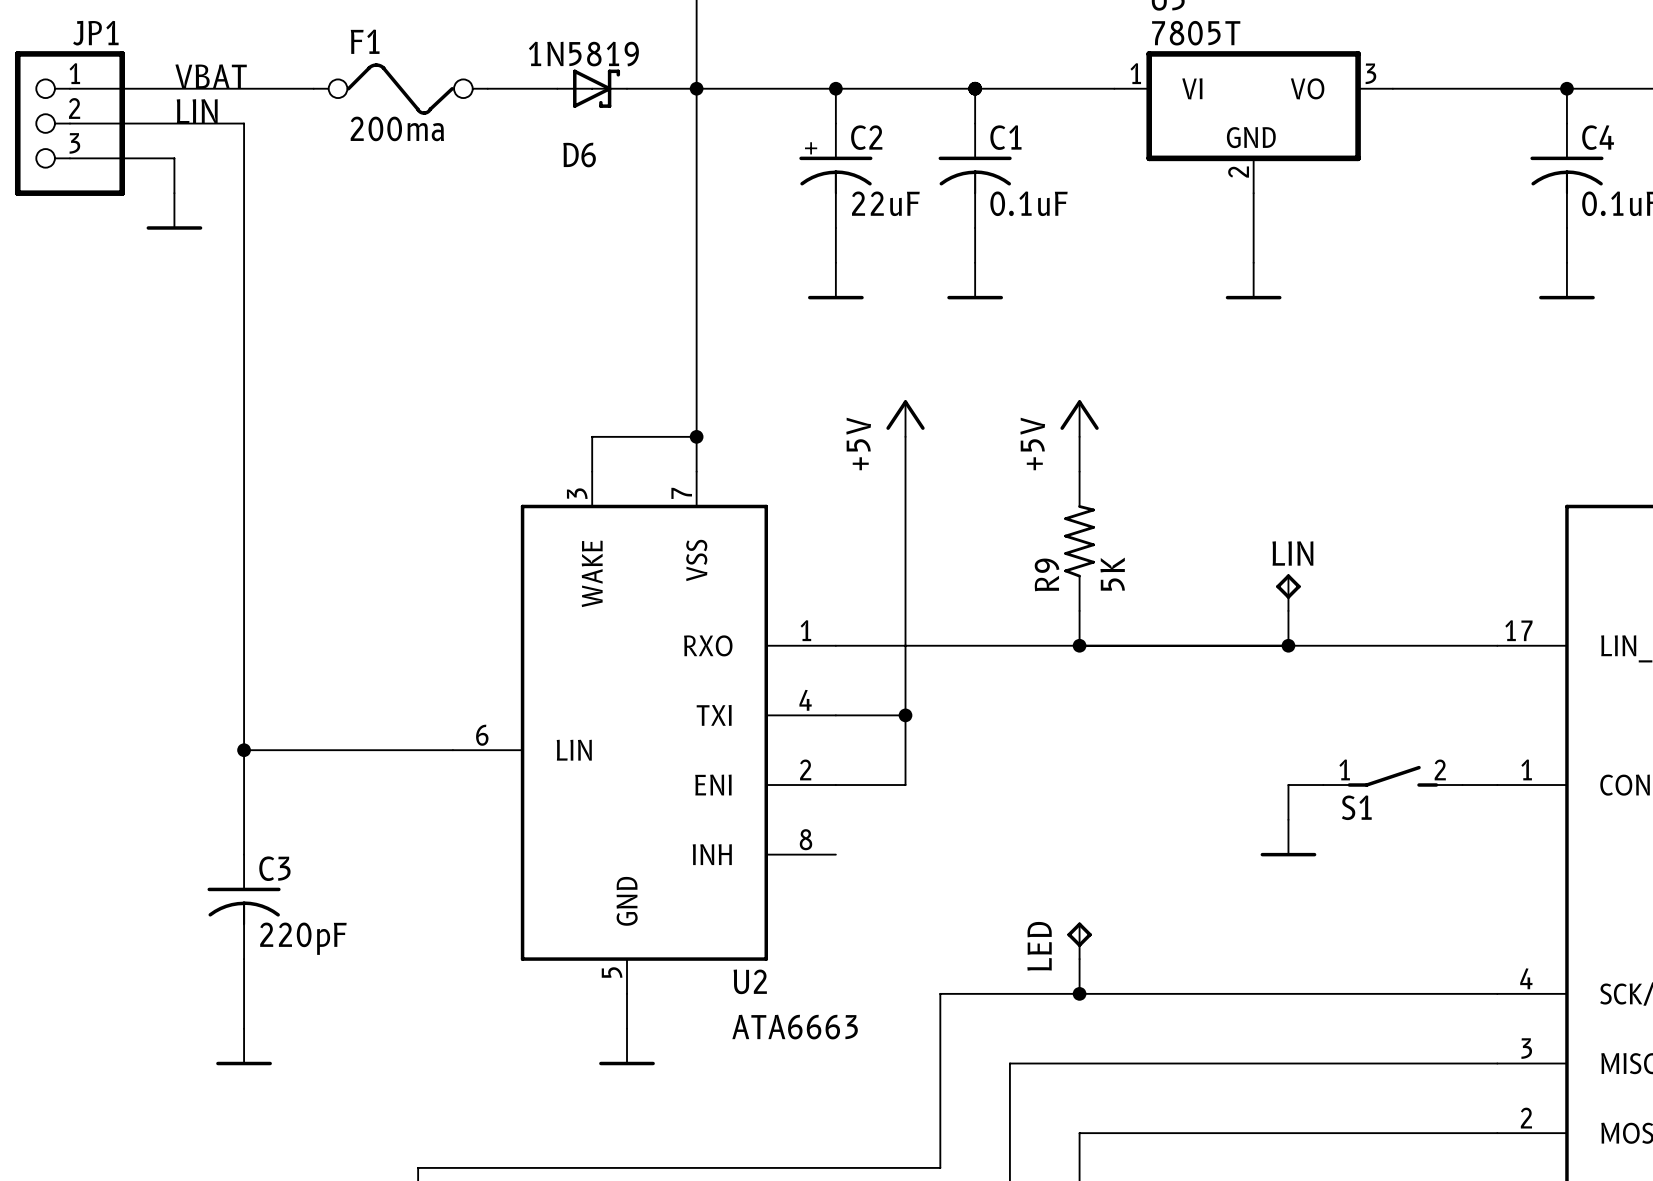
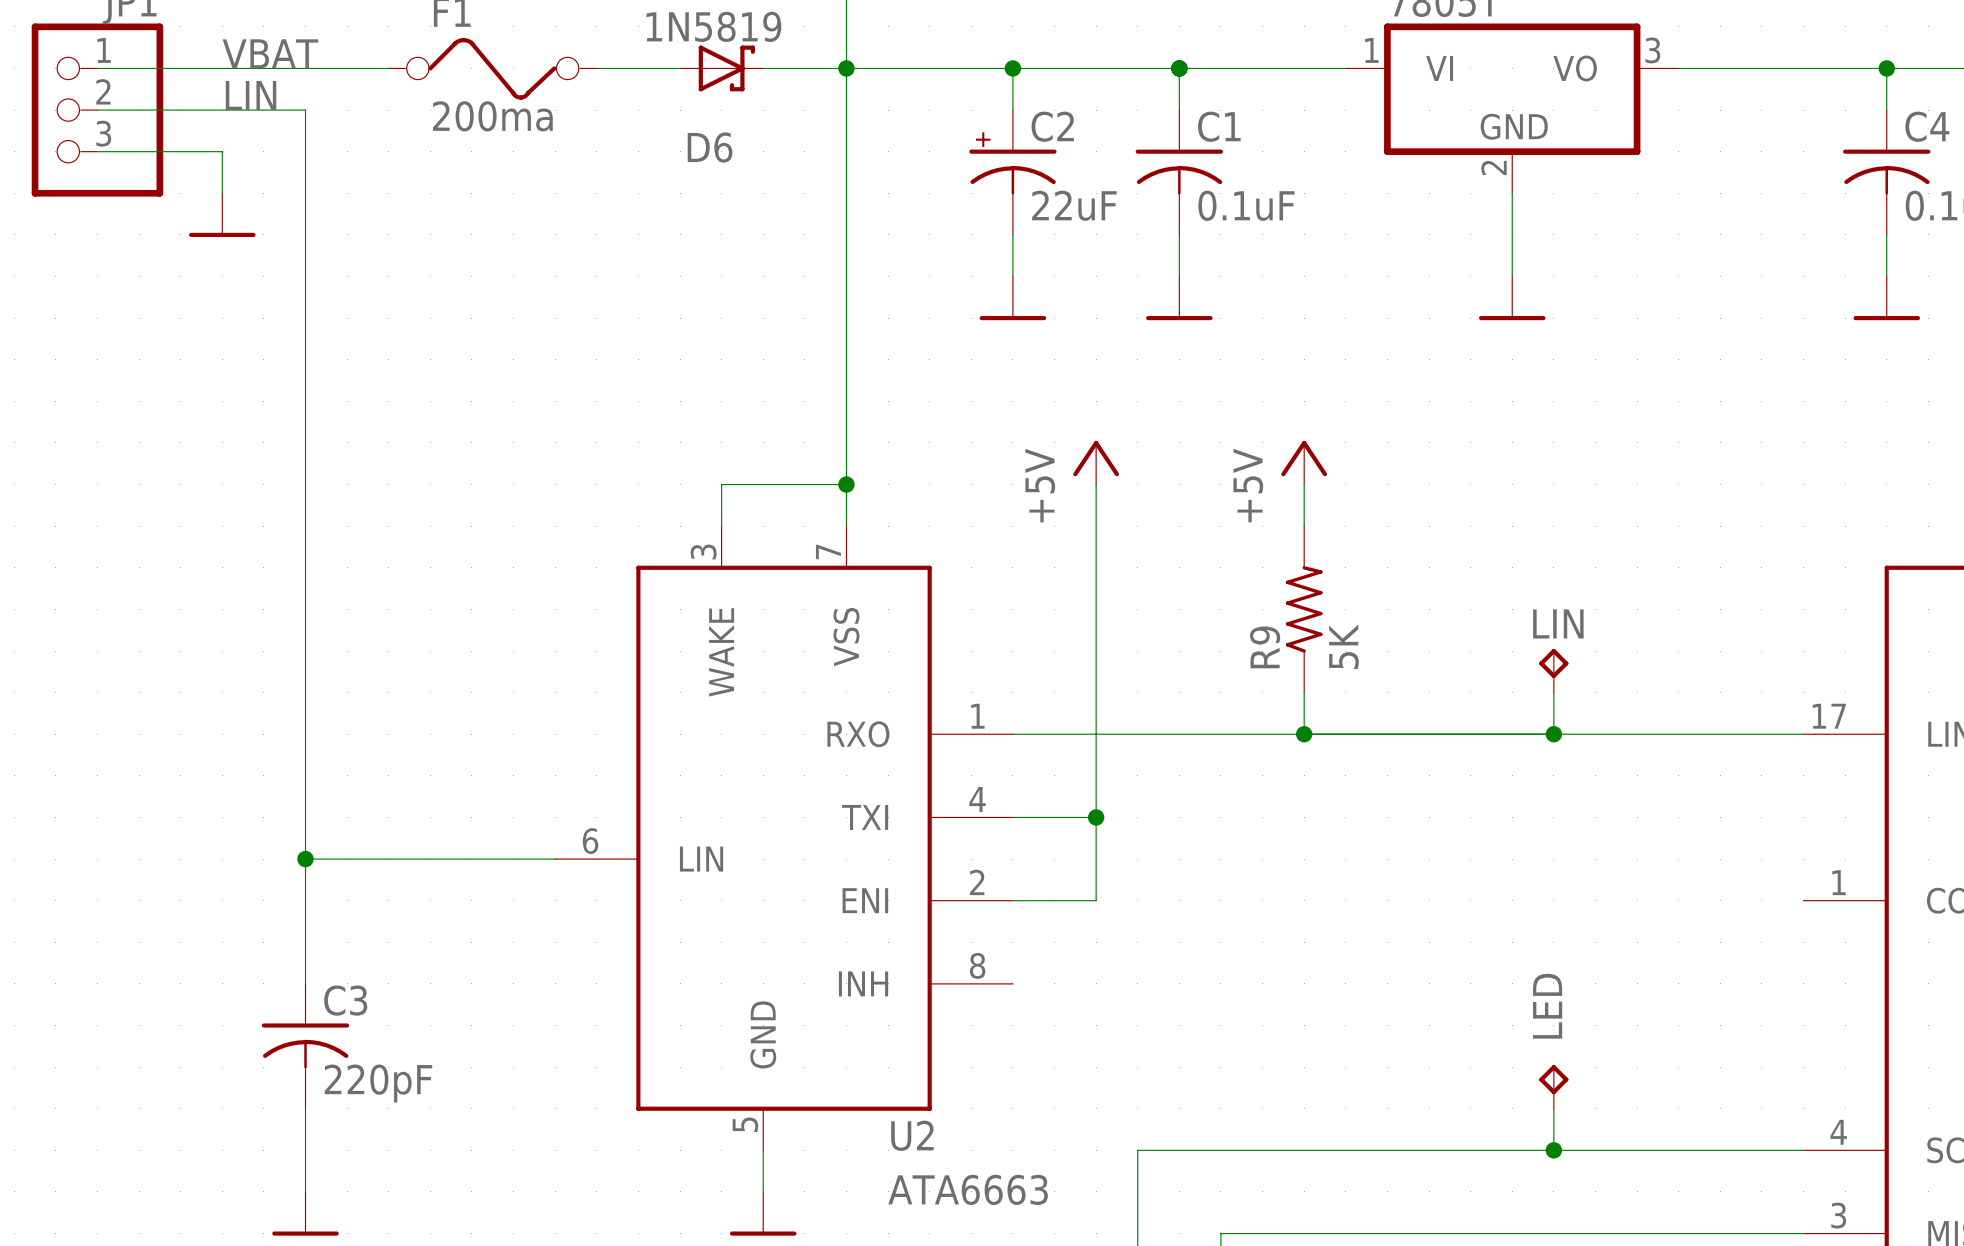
S1: (1392, 776) -> none
wire: (1323, 785) (1288, 785) (1288, 819) -> none
wire: (1462, 785) (1497, 785) -> none
power symbol: (1288, 838) -> none
LED position: (1079, 940) -> (1553, 1086)
LED name position: LED (1039, 946) -> LED (1547, 1006)
wire: (1079, 959) (1079, 993) -> (1553, 1108) (1553, 1150)
junction: (1079, 993) -> none
junction: none -> (1553, 1150)

